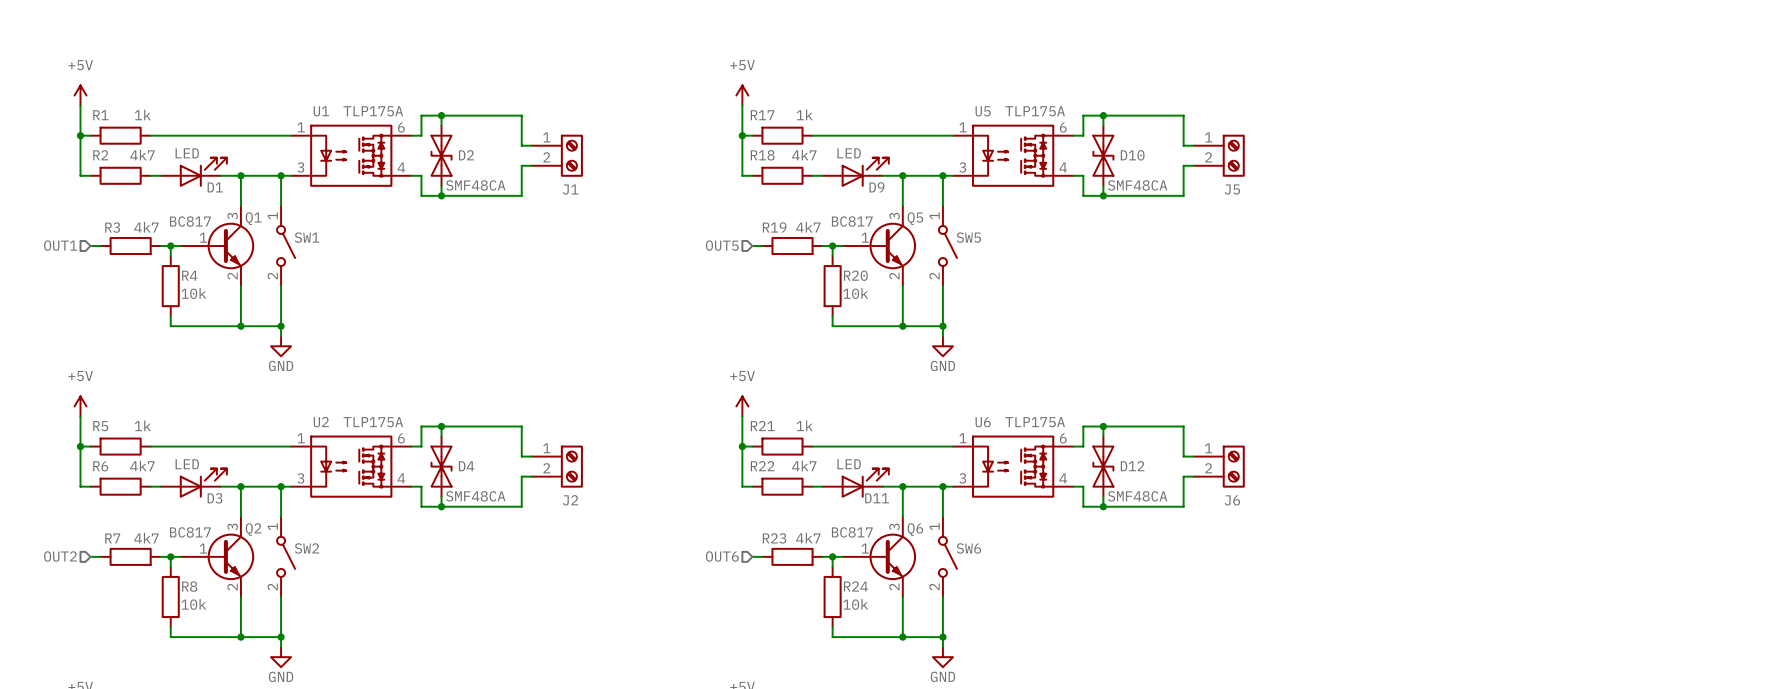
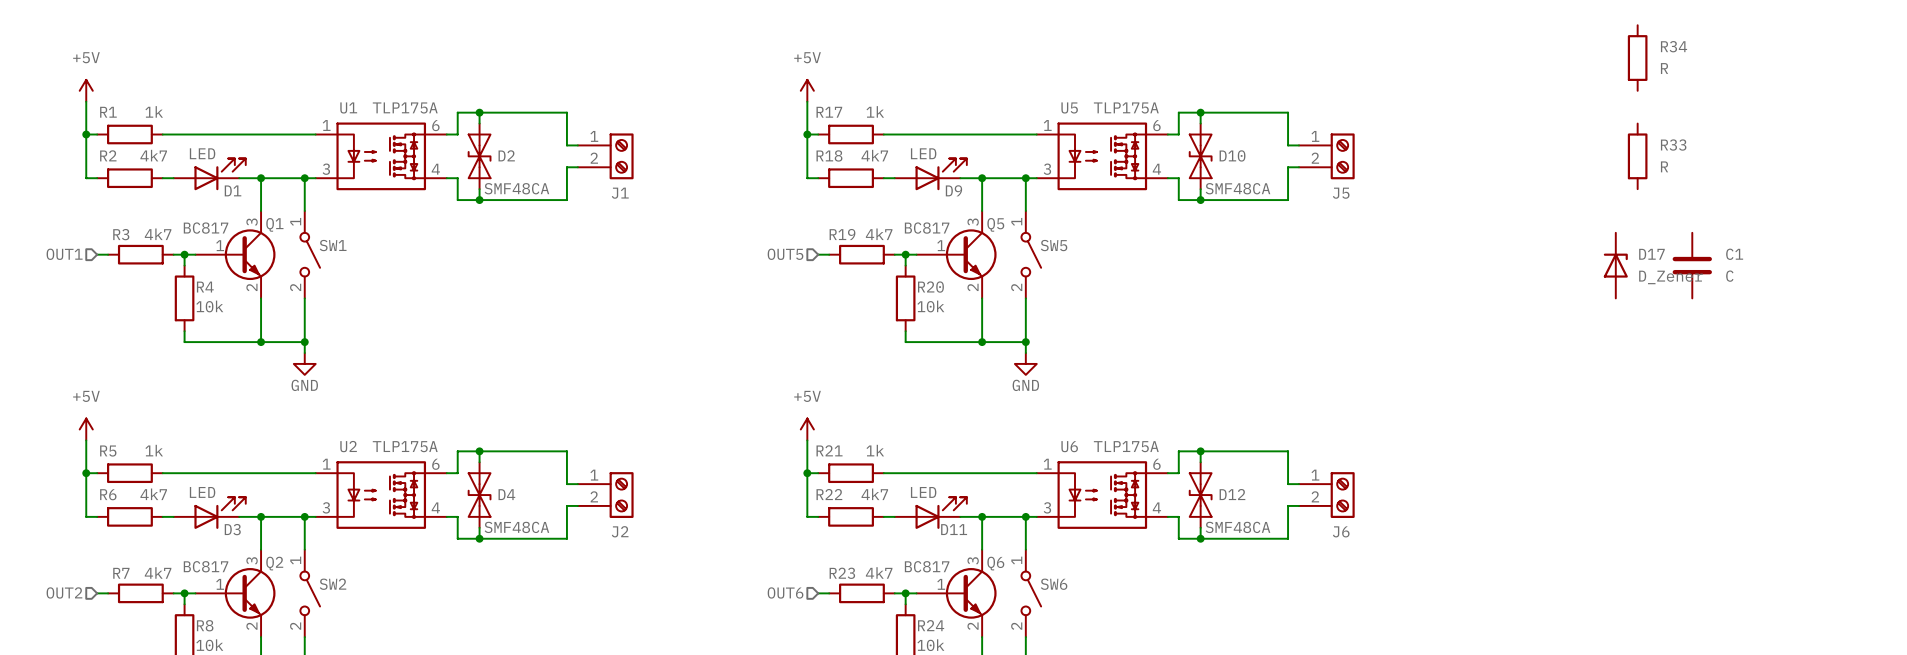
R34: none -> R (1637, 58)
R33: none -> R (1637, 156)
D17: none -> D_Zener (1615, 265)
C1: none -> C (1692, 265)

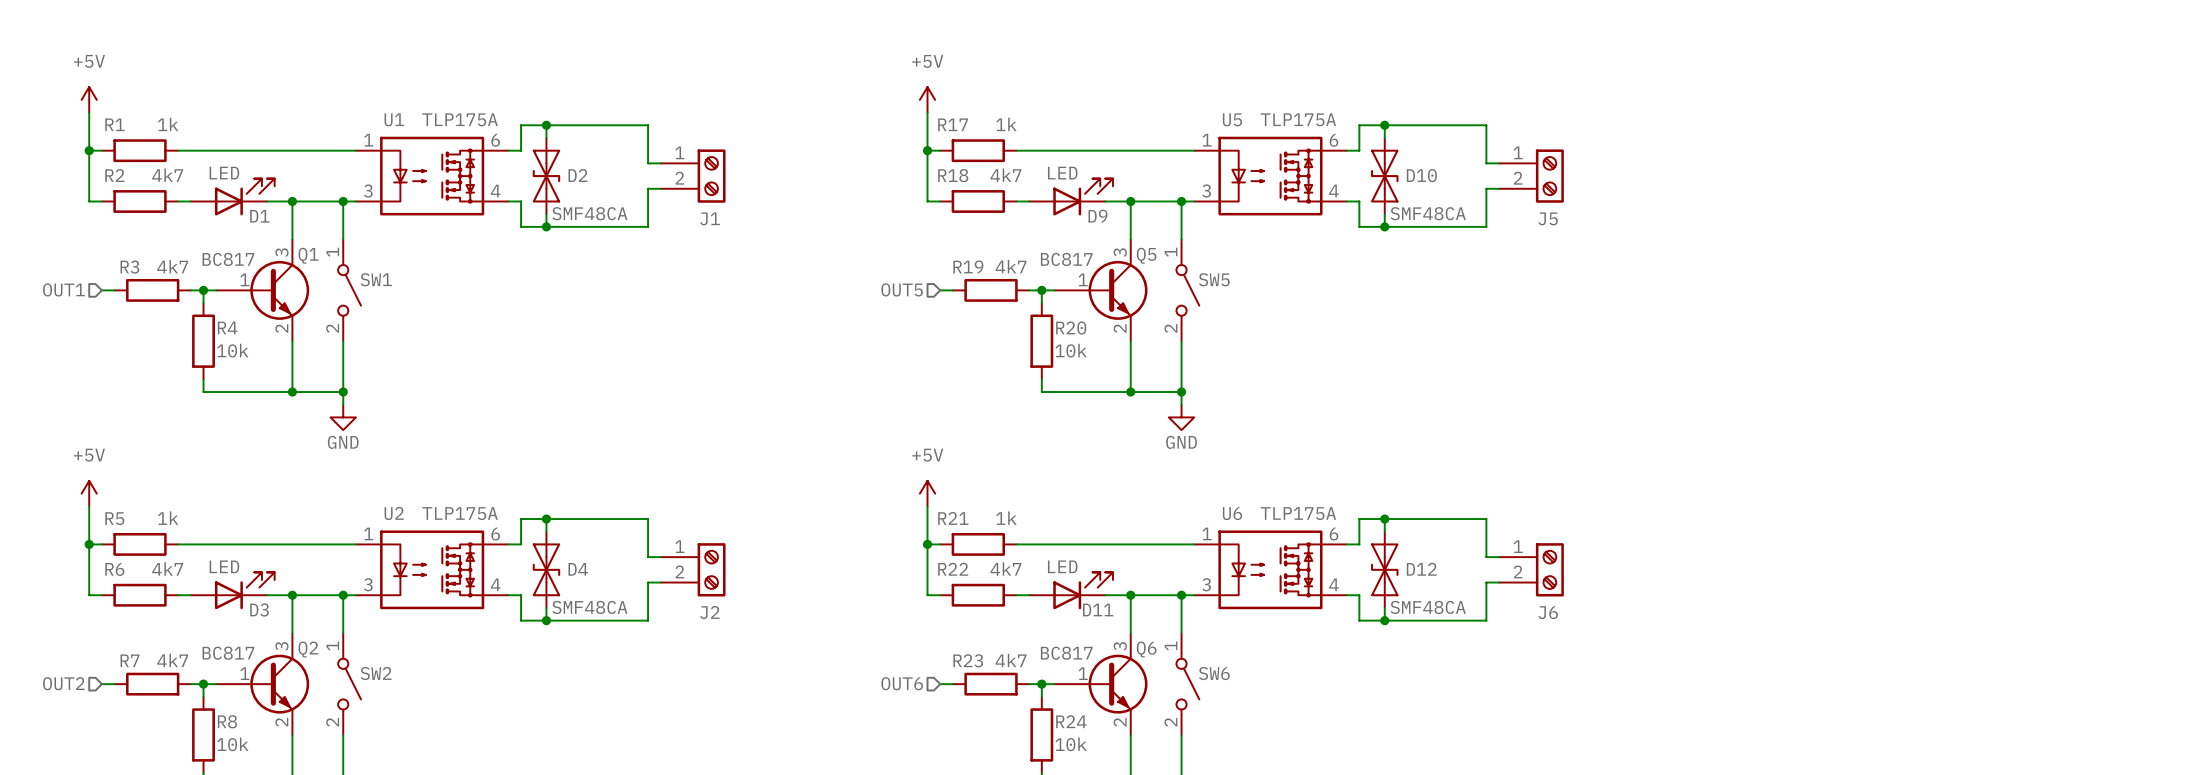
R34: R (1637, 58) -> none
R33: R (1637, 156) -> none
D17: D_Zener (1615, 265) -> none
C1: C (1692, 265) -> none

